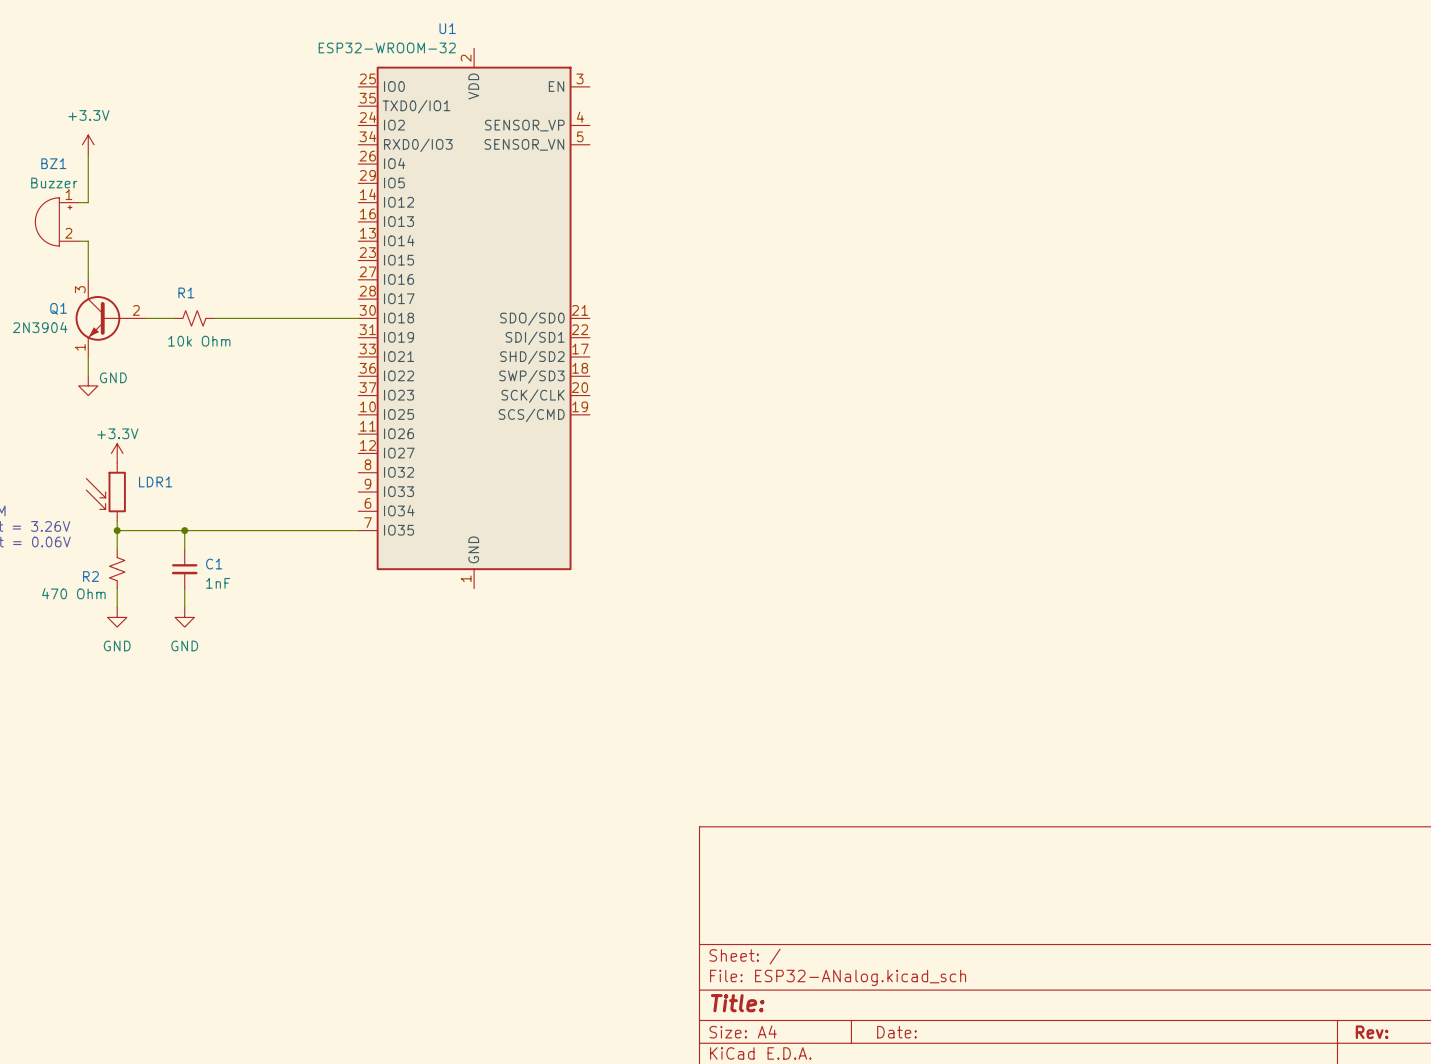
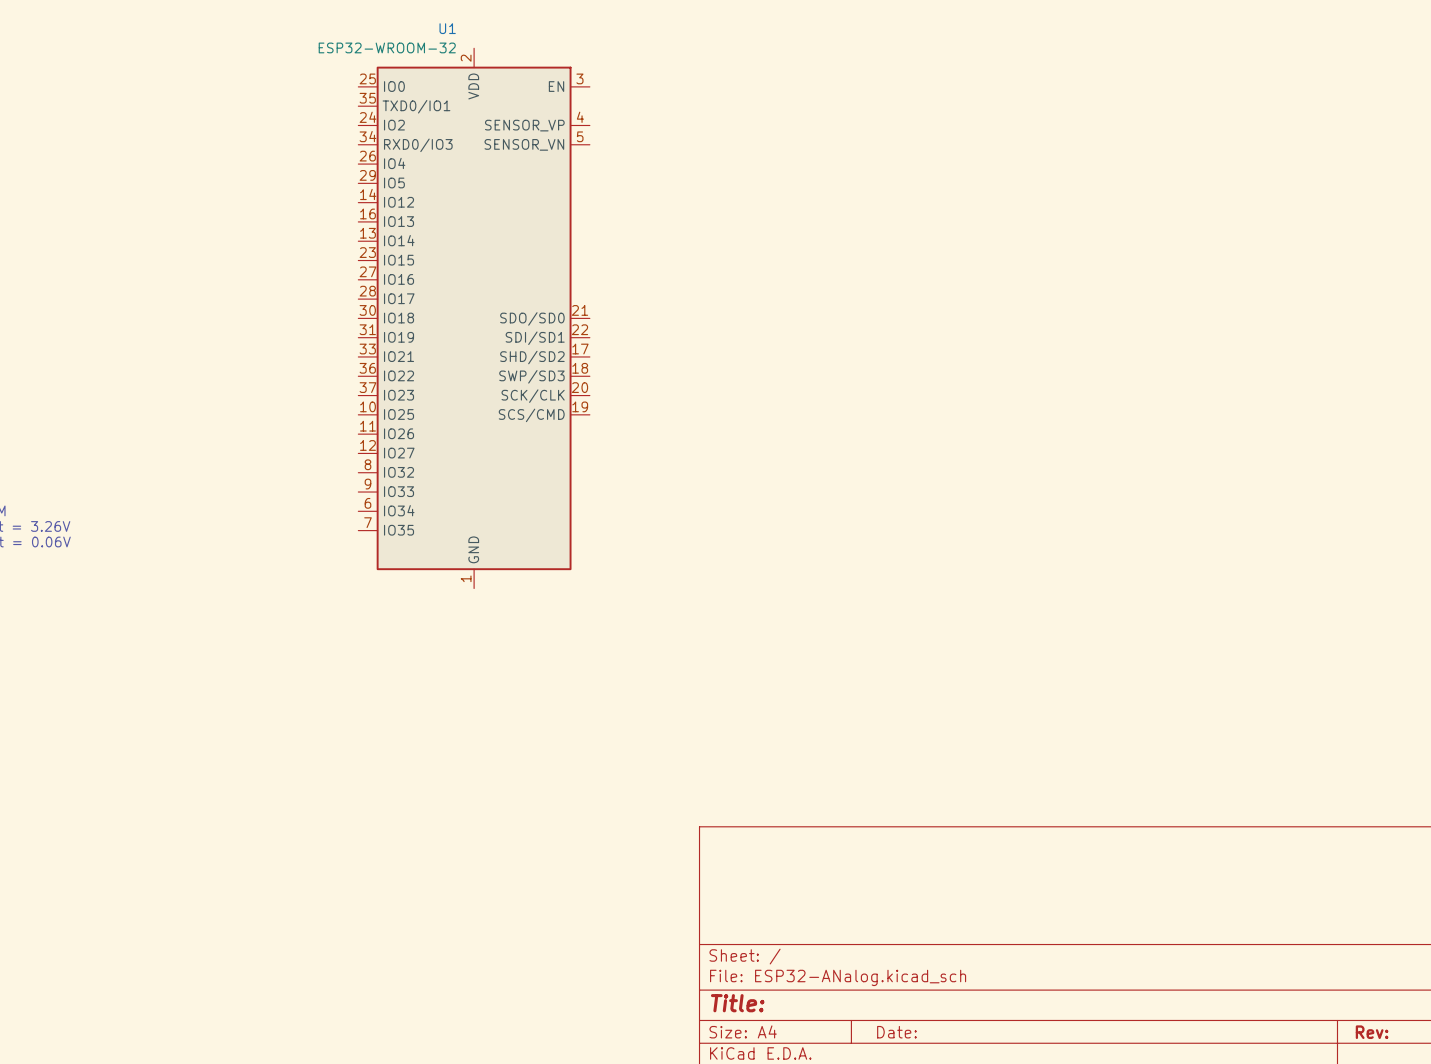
power symbol: +3.3V (88, 144) -> none
wire: (88, 154) (88, 202) (78, 202) -> none
BZ1: Buzzer (56, 221) -> none
wire: (78, 241) (88, 241) (88, 279) -> none
Q1: 2N3904 (110, 318) -> none
wire: (146, 318) (175, 318) -> none
R1: 10k Ohm (194, 318) -> none
wire: (213, 318) (358, 318) -> none
wire: (88, 356) (88, 376) -> none
power symbol: GND (88, 385) -> none
power symbol: +3.3V (117, 453) -> none
LDR1: (106, 492) -> none
wire: (117, 520) (117, 549) -> none
wire: (117, 530) (358, 530) -> none
junction: (117, 530) -> none
wire: (184, 530) (184, 549) -> none
junction: (184, 530) -> none
R2: 470 Ohm (117, 569) -> none
C1: 1nF (184, 569) -> none
wire: (117, 588) (117, 607) -> none
wire: (184, 588) (184, 607) -> none
power symbol: GND (117, 617) -> none
power symbol: GND (184, 617) -> none

